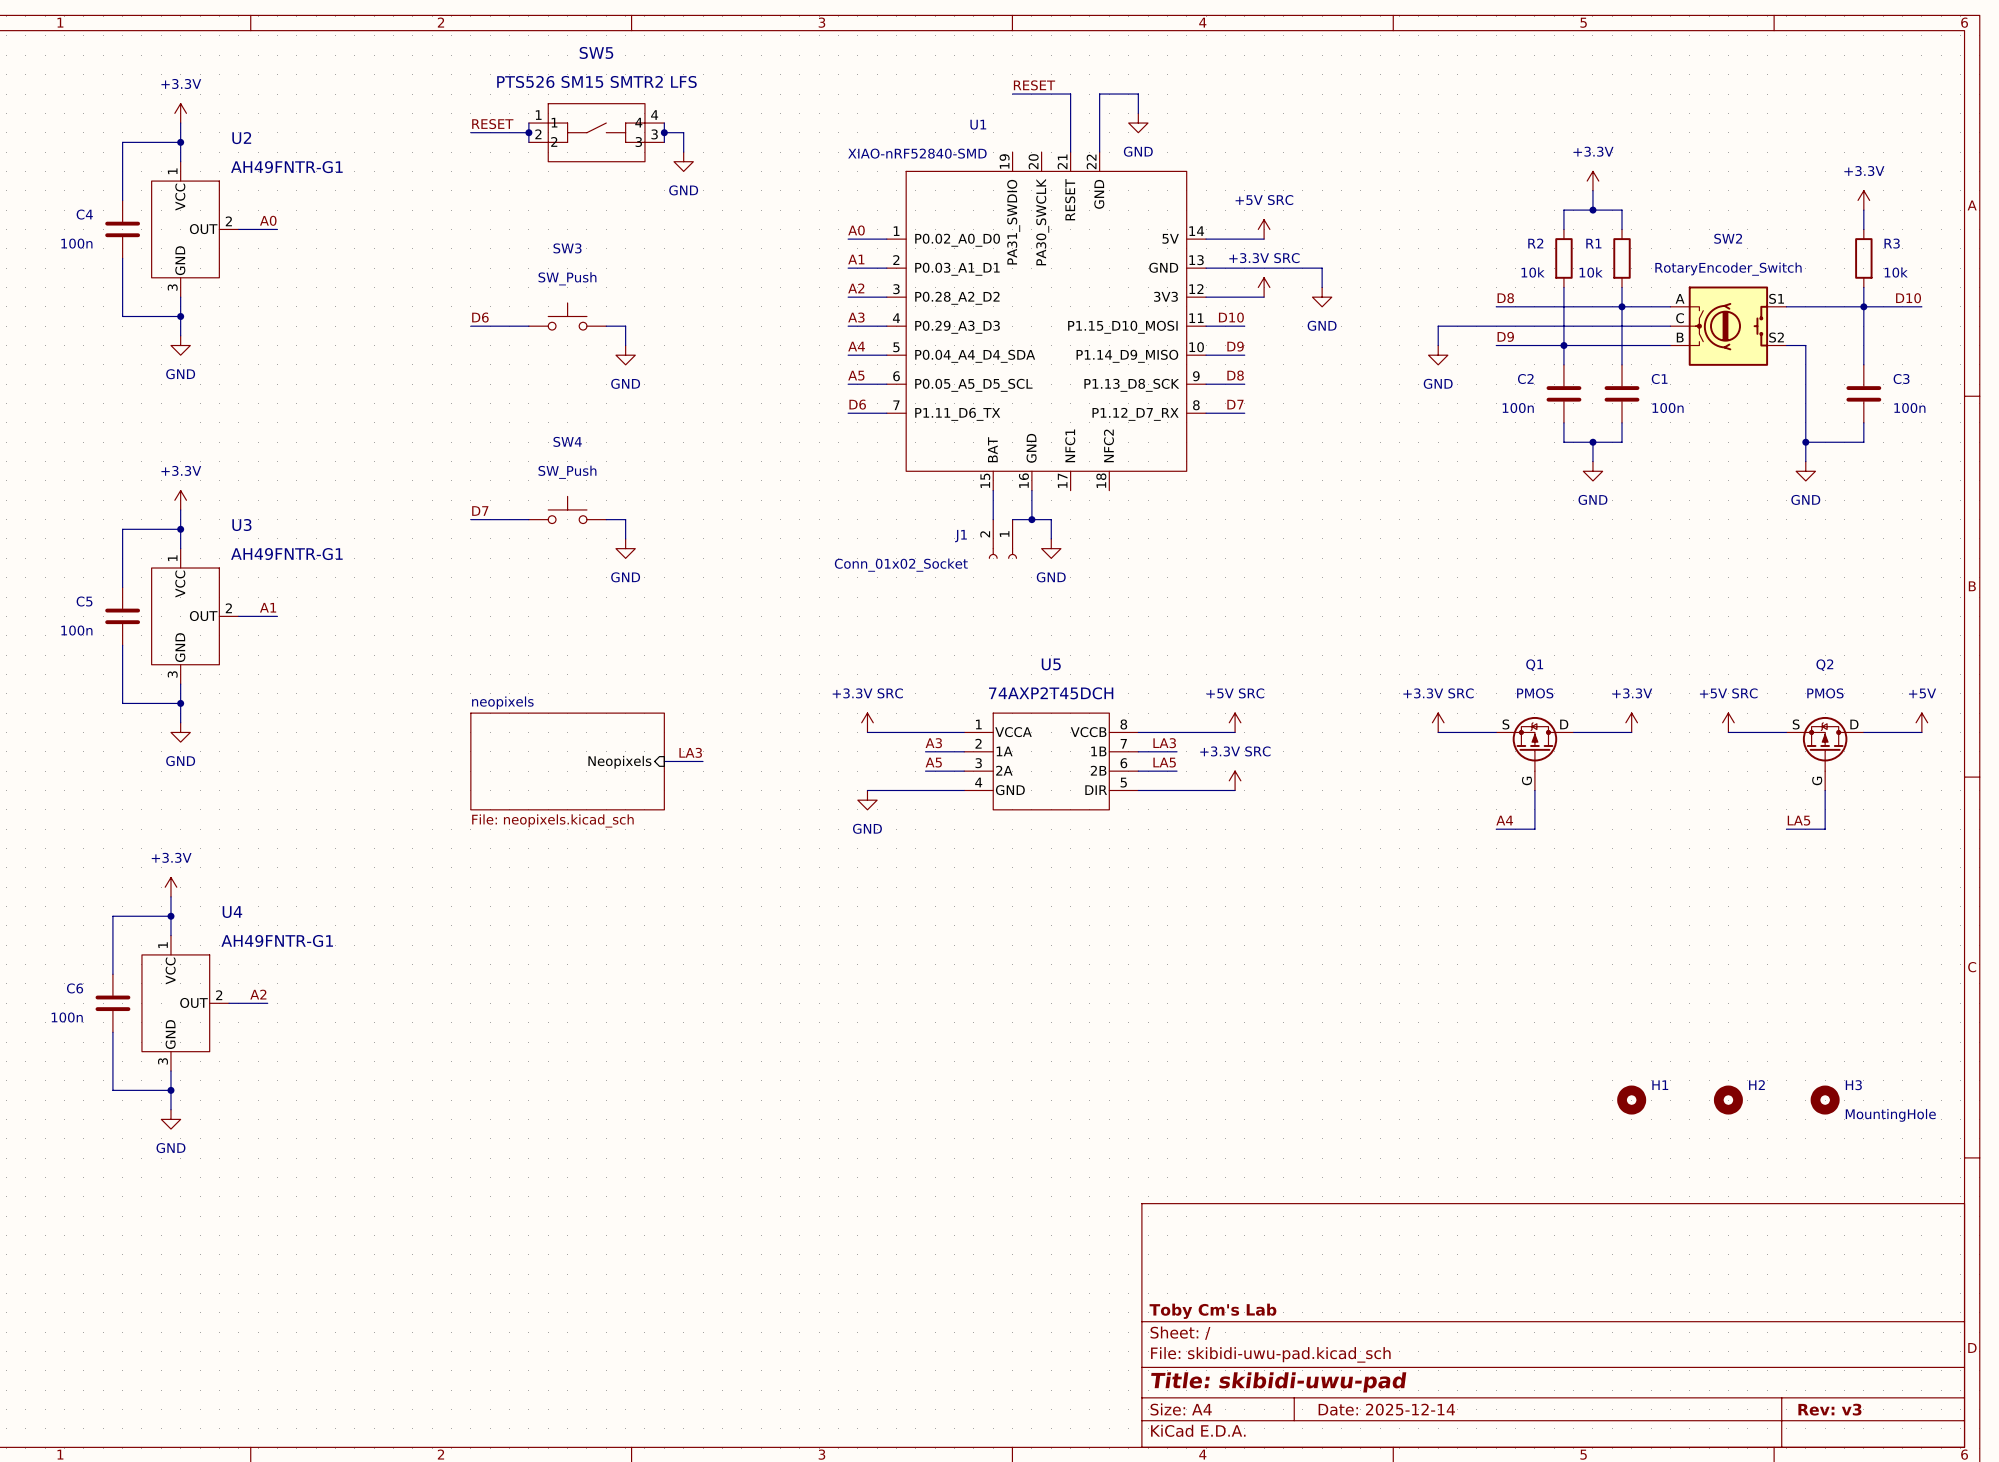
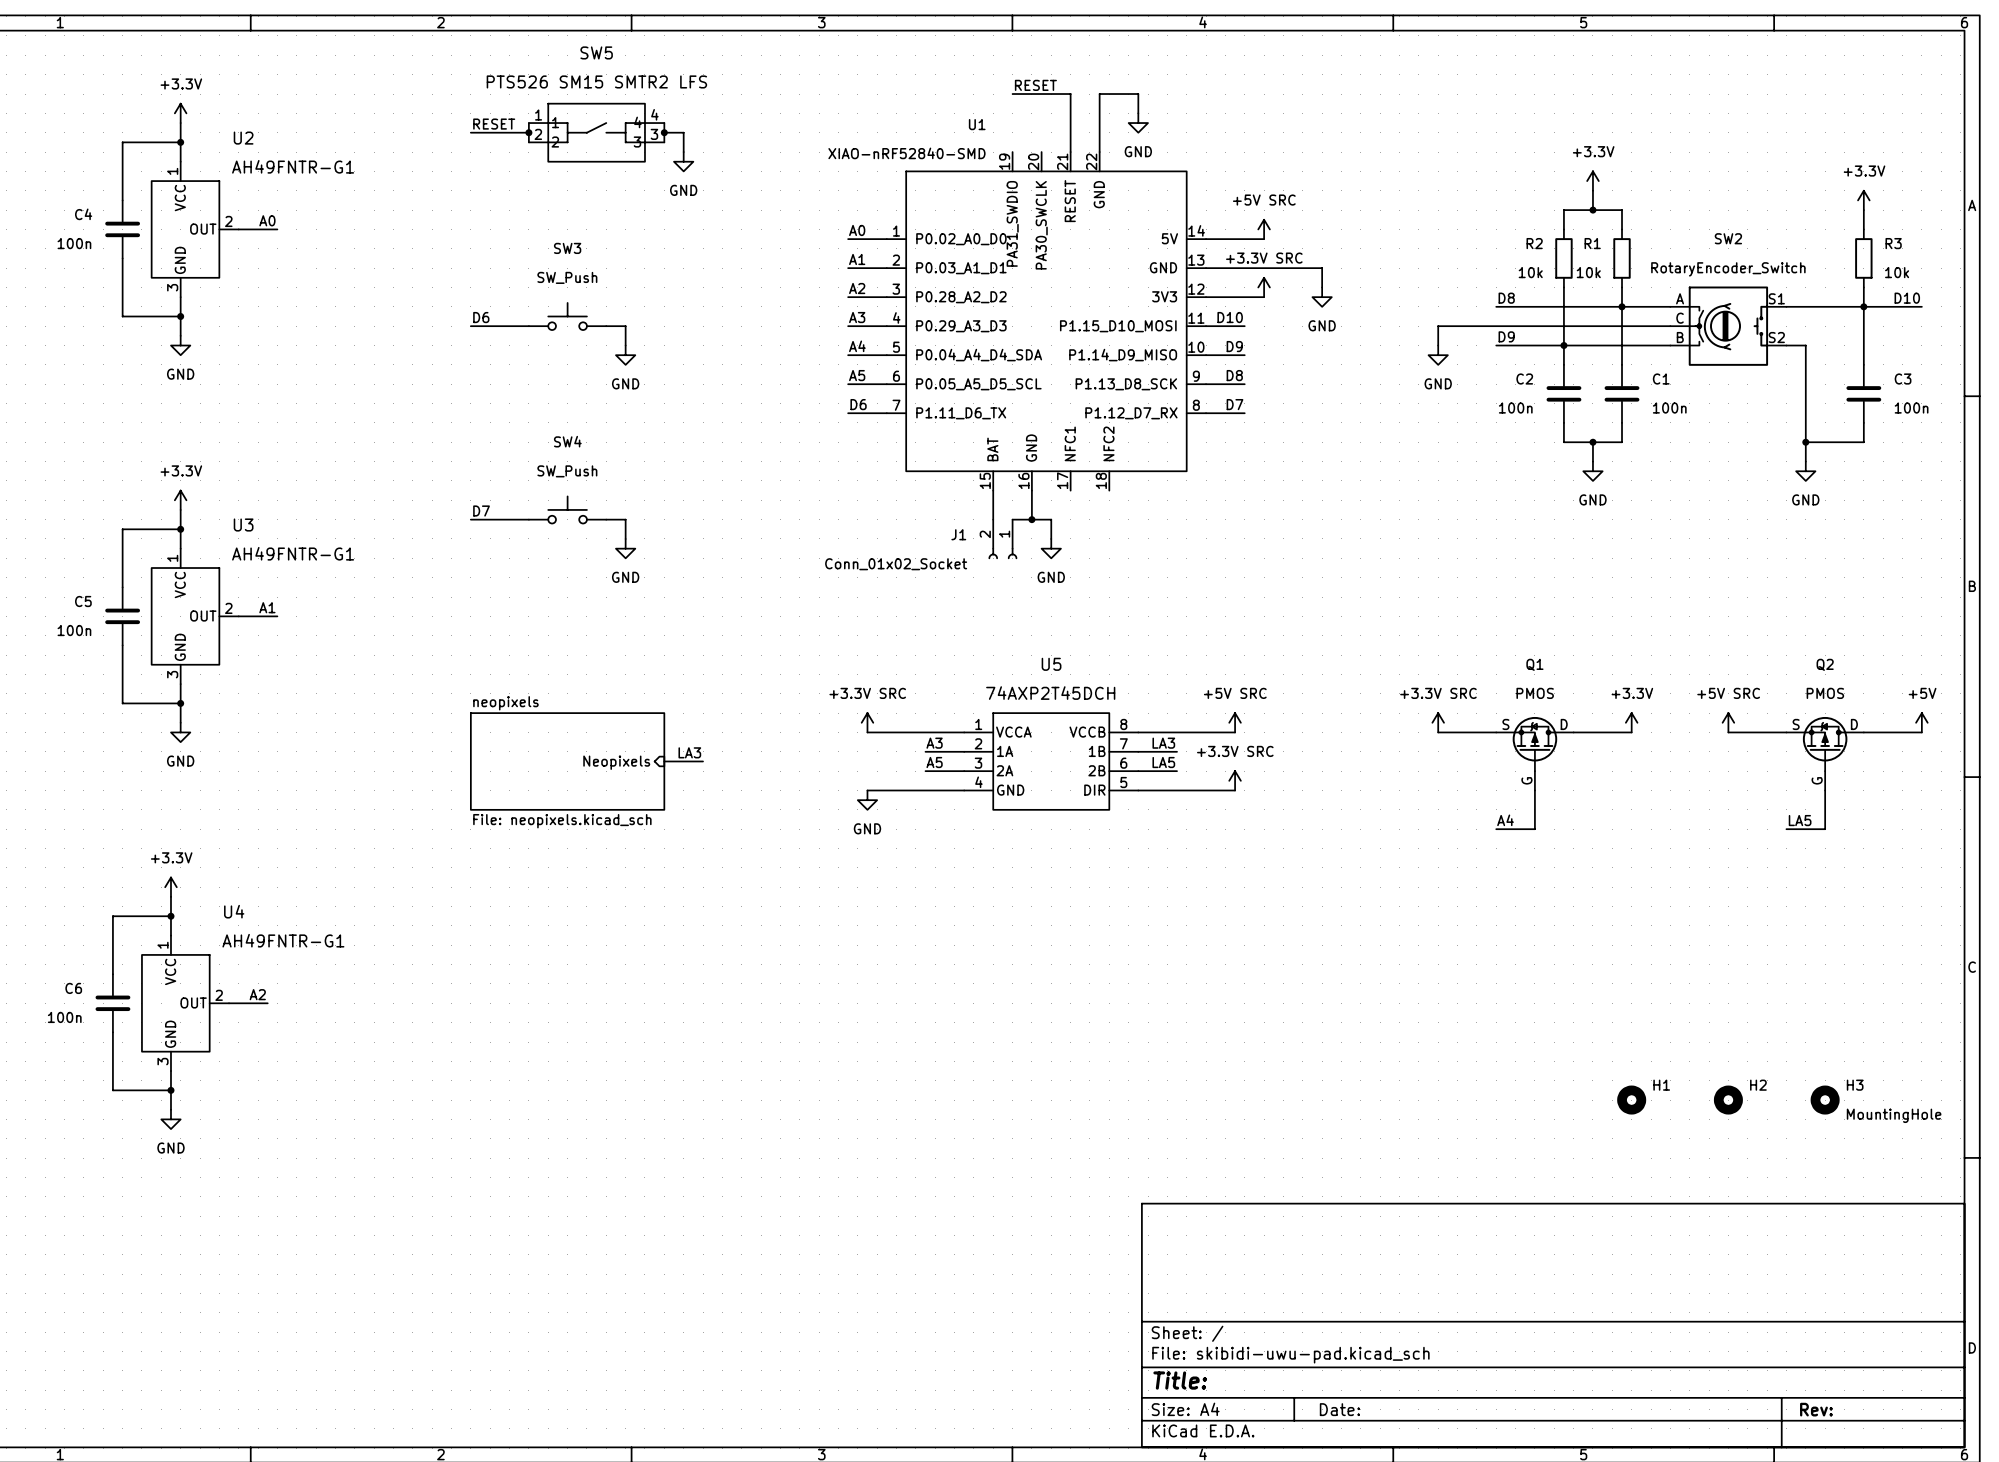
title block: Toby Cm's Lab (1212, 1311) -> none
title block: Title: skibidi-uwu-pad (1278, 1382) -> Title: (1180, 1380)
title block: Date: 2025-12-14 (1386, 1409) -> Date: (1339, 1409)
title block: Rev: v3 (1829, 1409) -> Rev: (1816, 1409)

